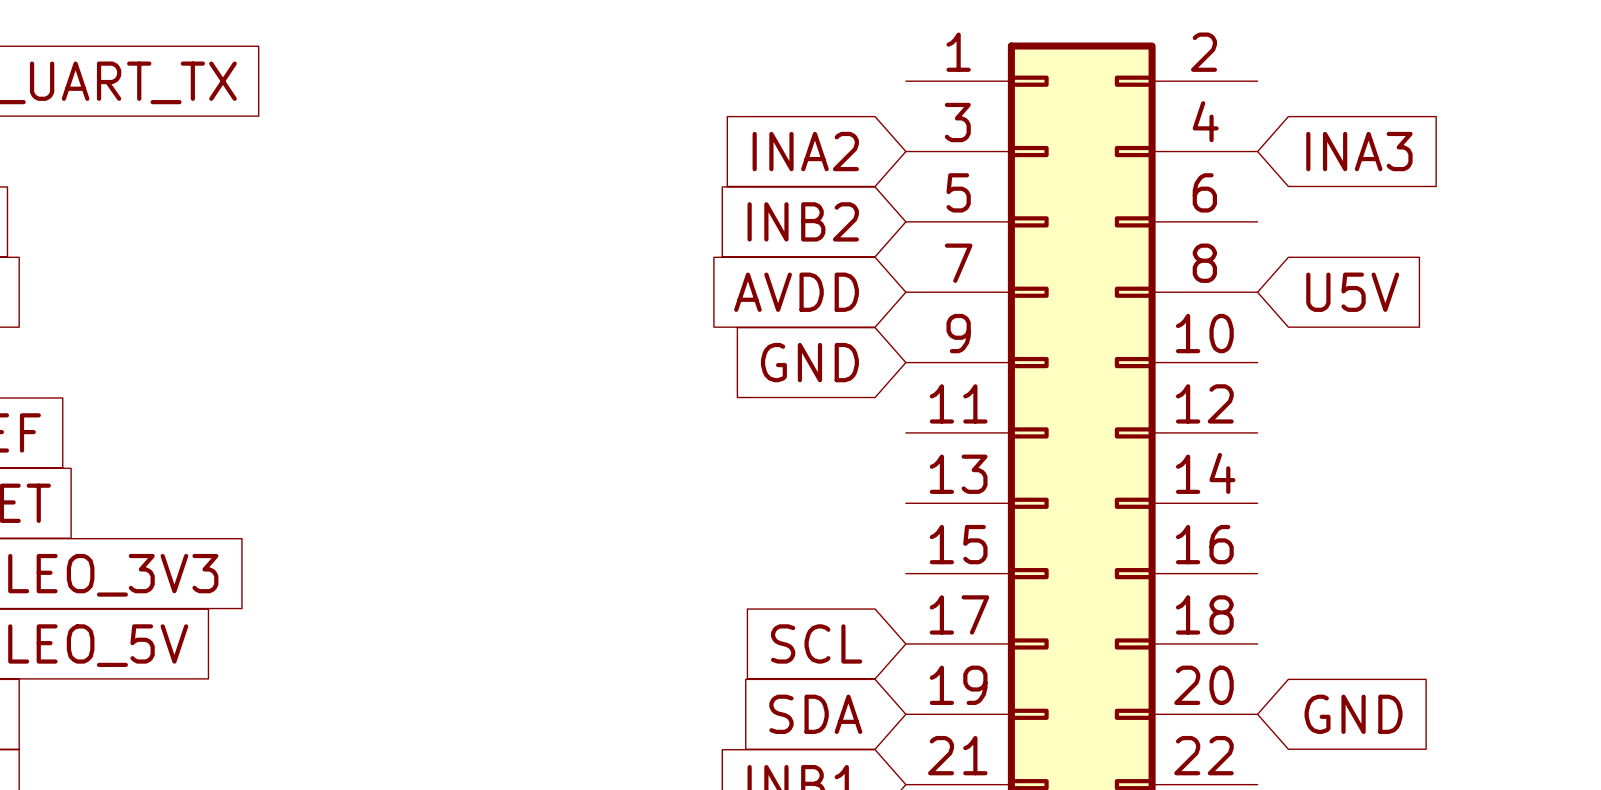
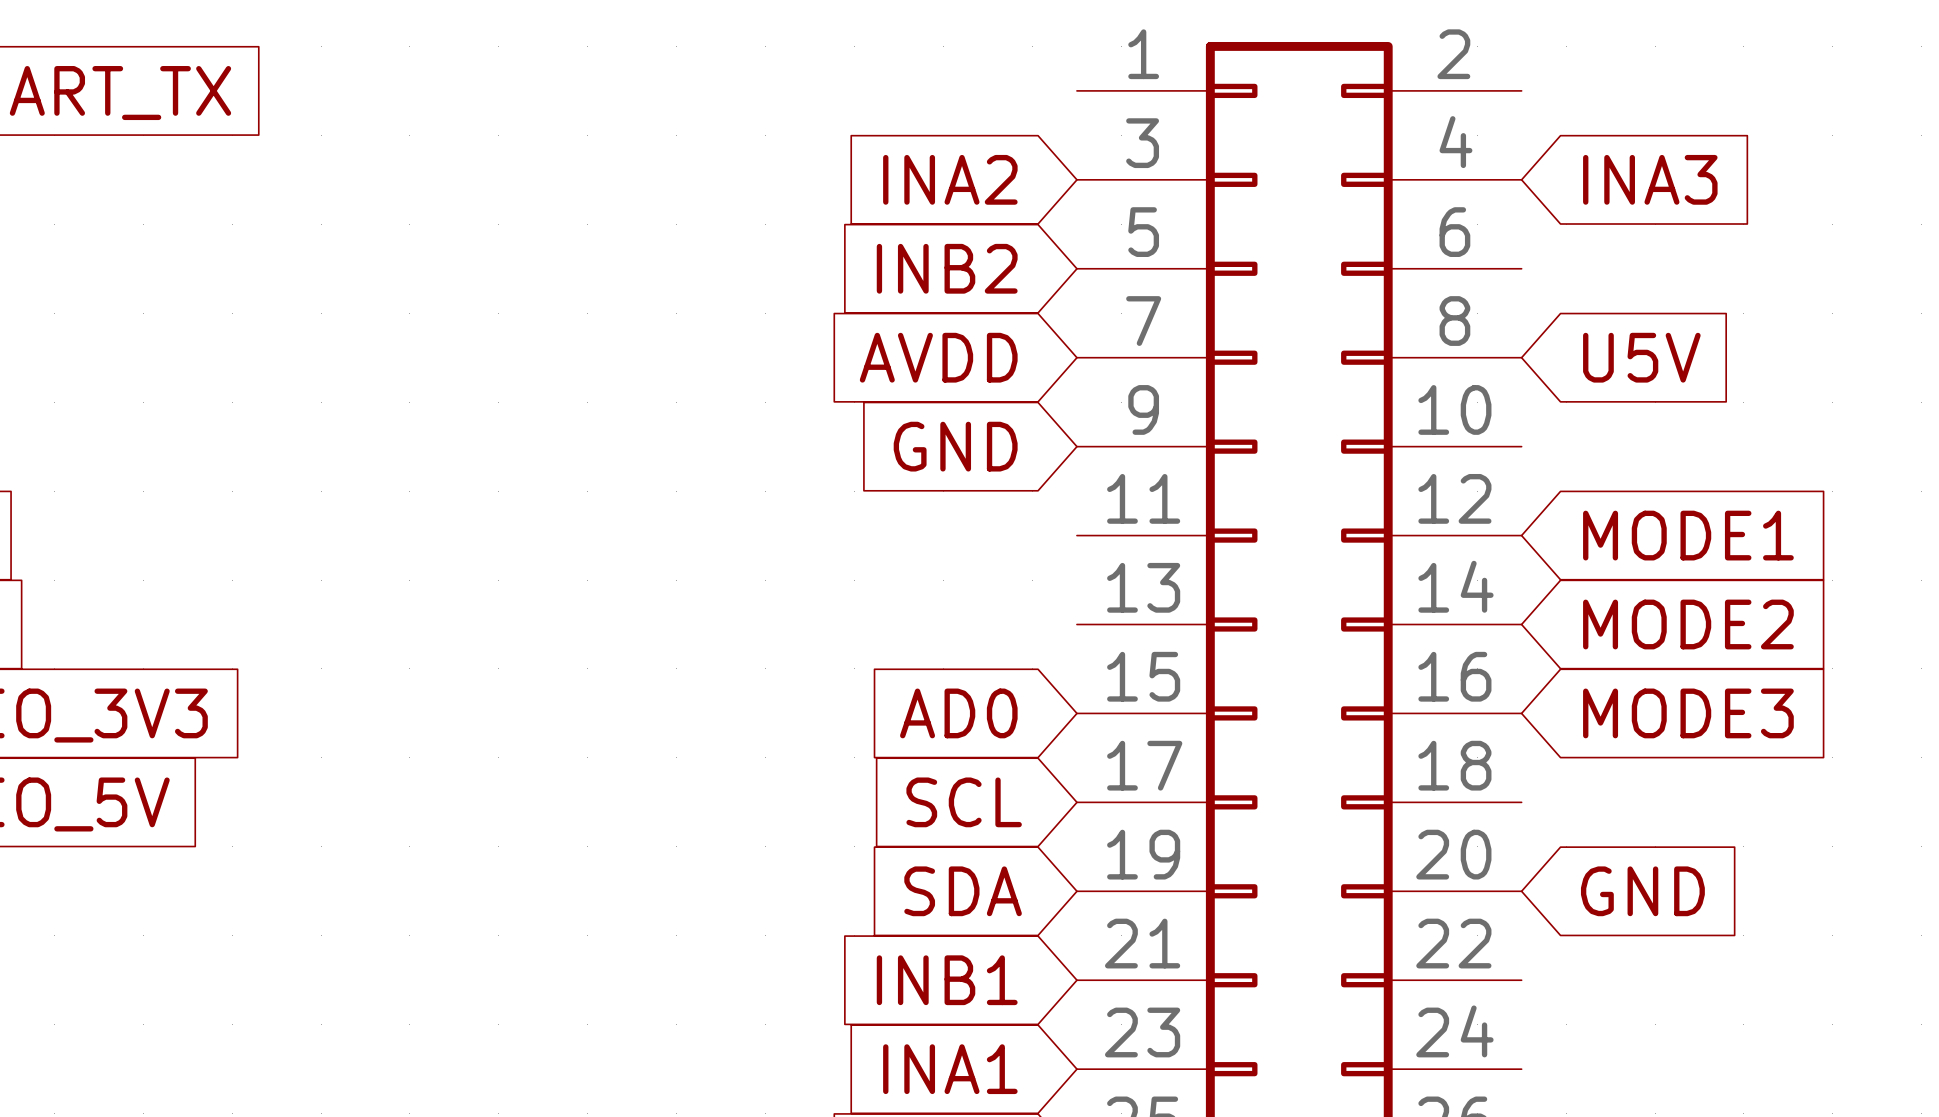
global label: none -> MODE1 (1688, 535)
global label: none -> MODE2 (1688, 624)
global label: none -> AD0 (958, 713)
global label: none -> MODE3 (1688, 713)

